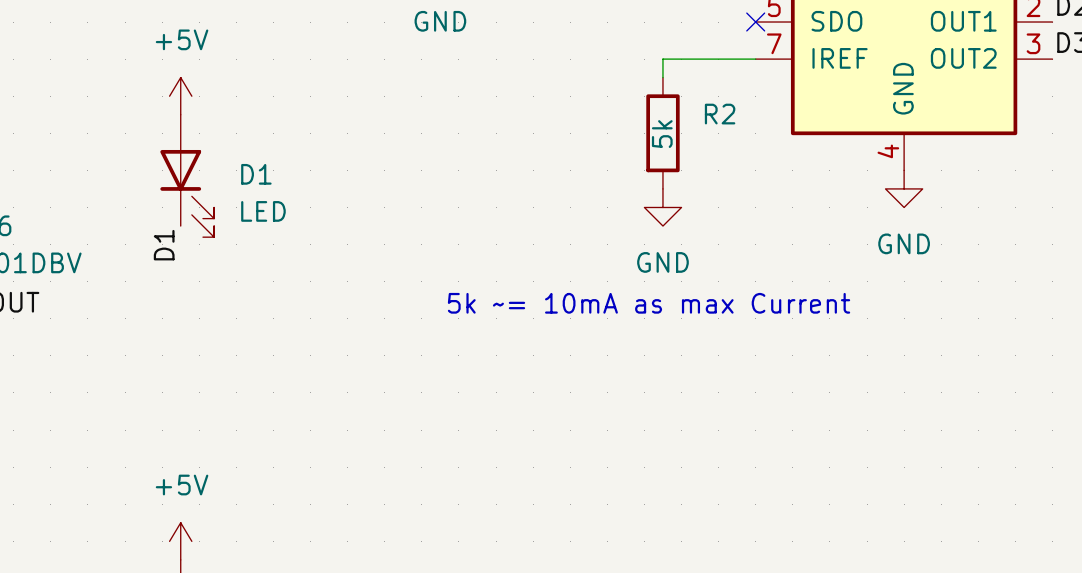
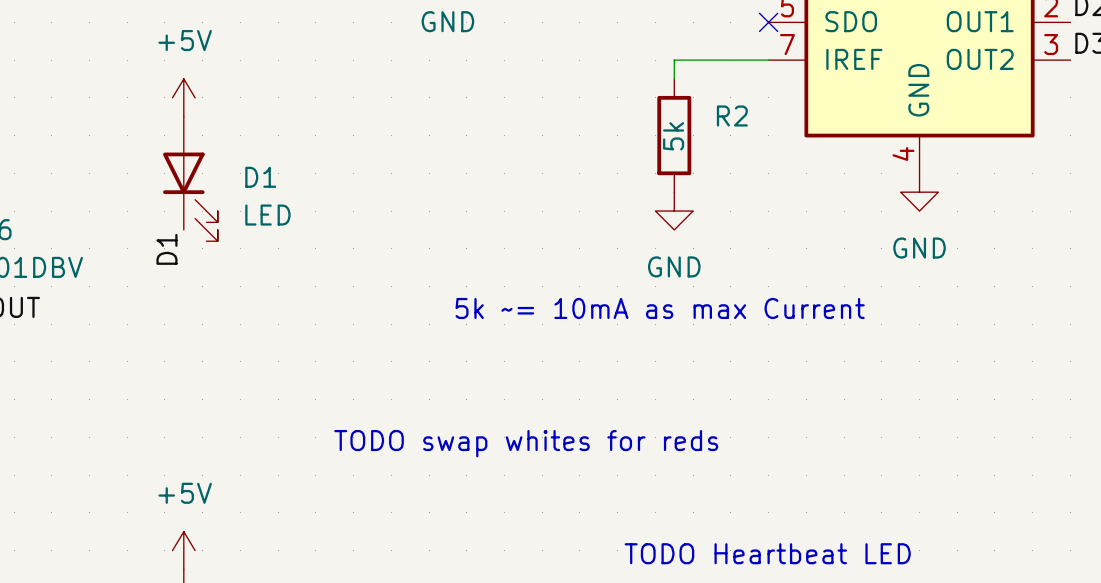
text: none -> TODO swap whites for reds (526, 443)
text: none -> TODO Heartbeat LED (767, 553)

